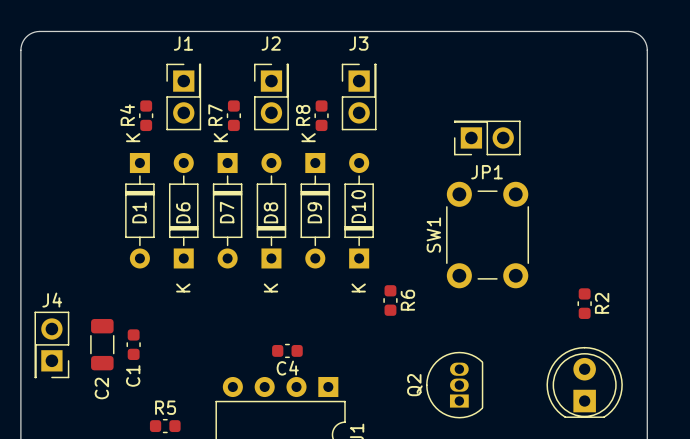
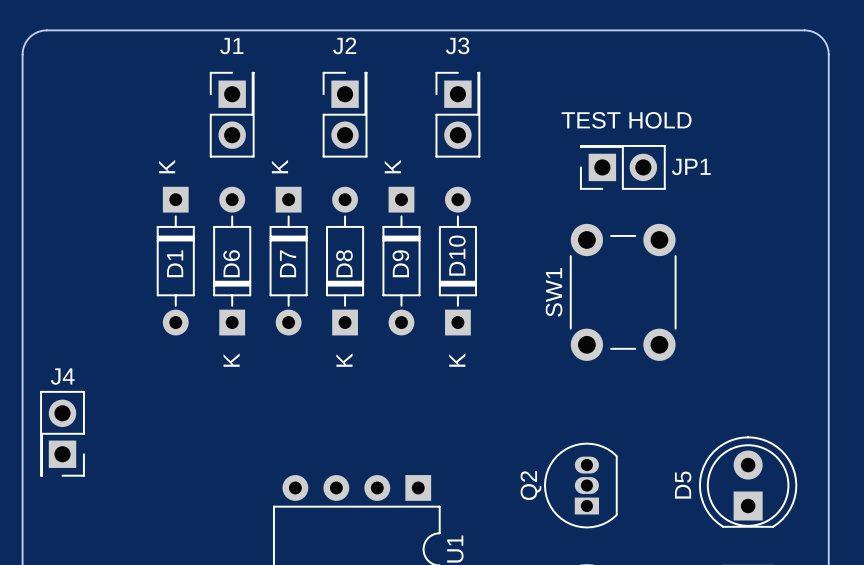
text: none -> TEST HOLD (626, 120)
R4: (146, 115) -> none
R7: (233, 115) -> none
R8: (321, 115) -> none
JP1 name position: JP1 (487, 172) -> JP1 (691, 166)
R6: (390, 300) -> none
R2: (584, 303) -> none
C2: (102, 344) -> none
C1: (133, 344) -> none
C4: (287, 350) -> none
D5 name: none -> D5 (683, 485)
R5: (165, 426) -> none

